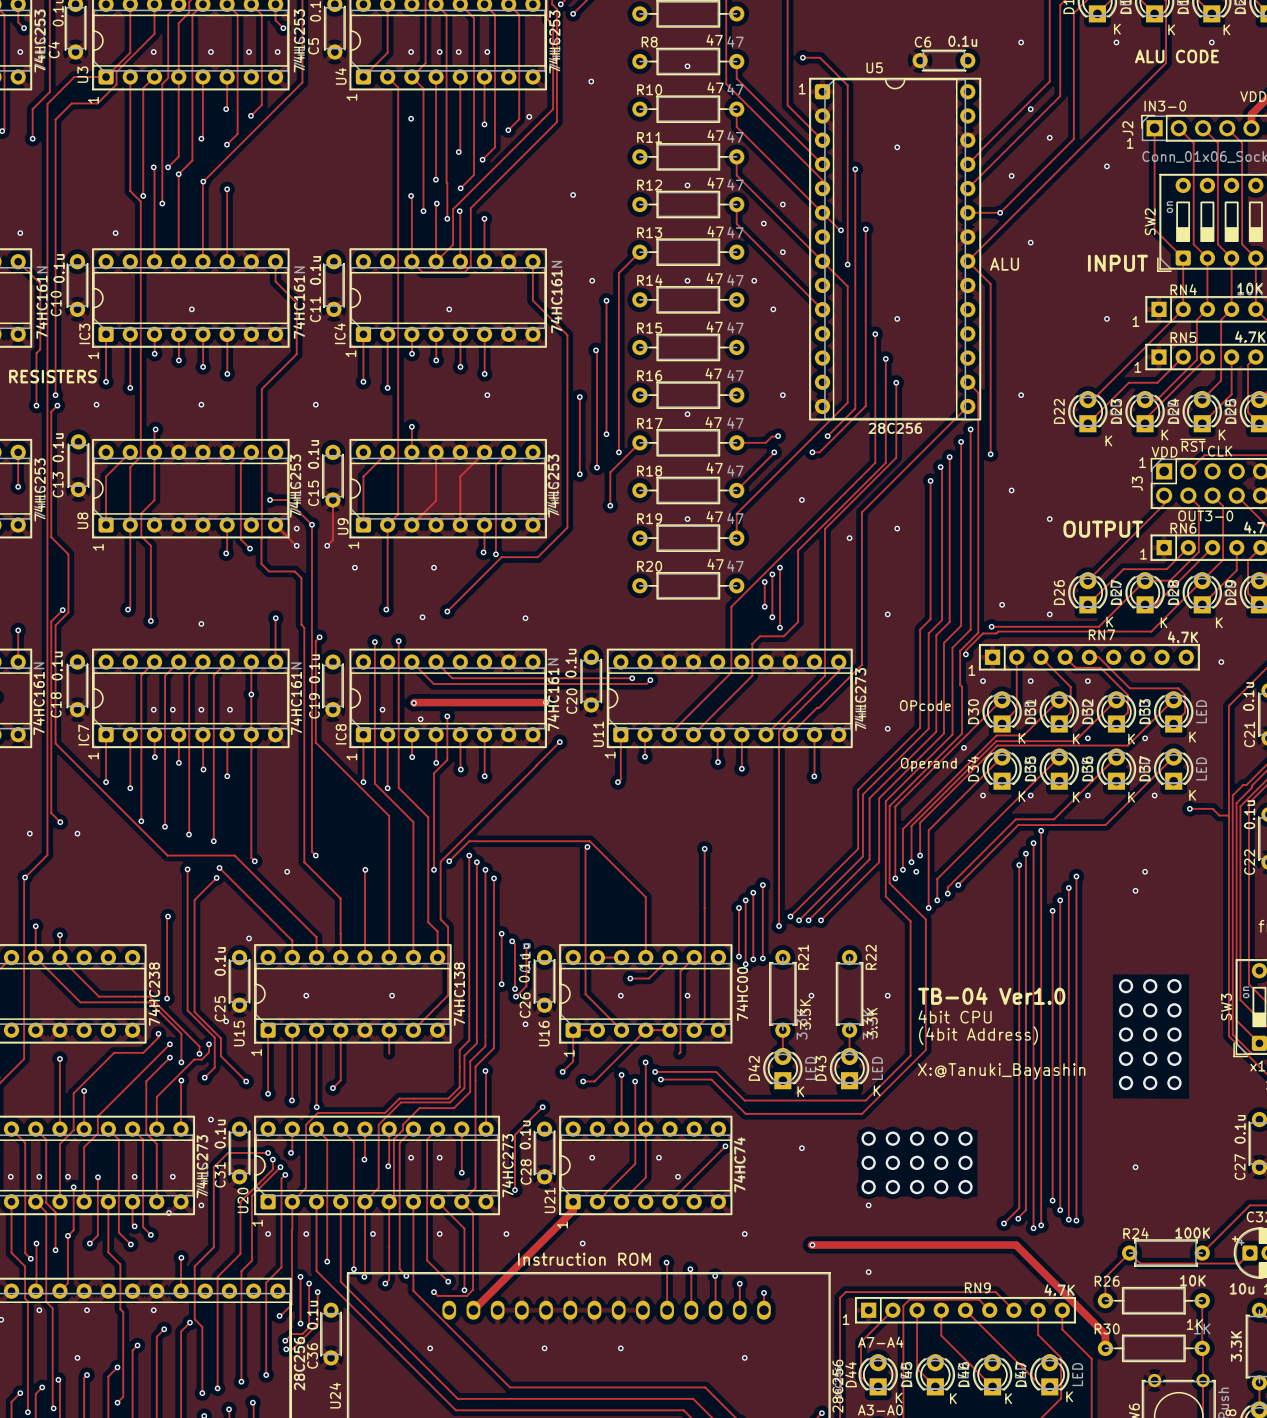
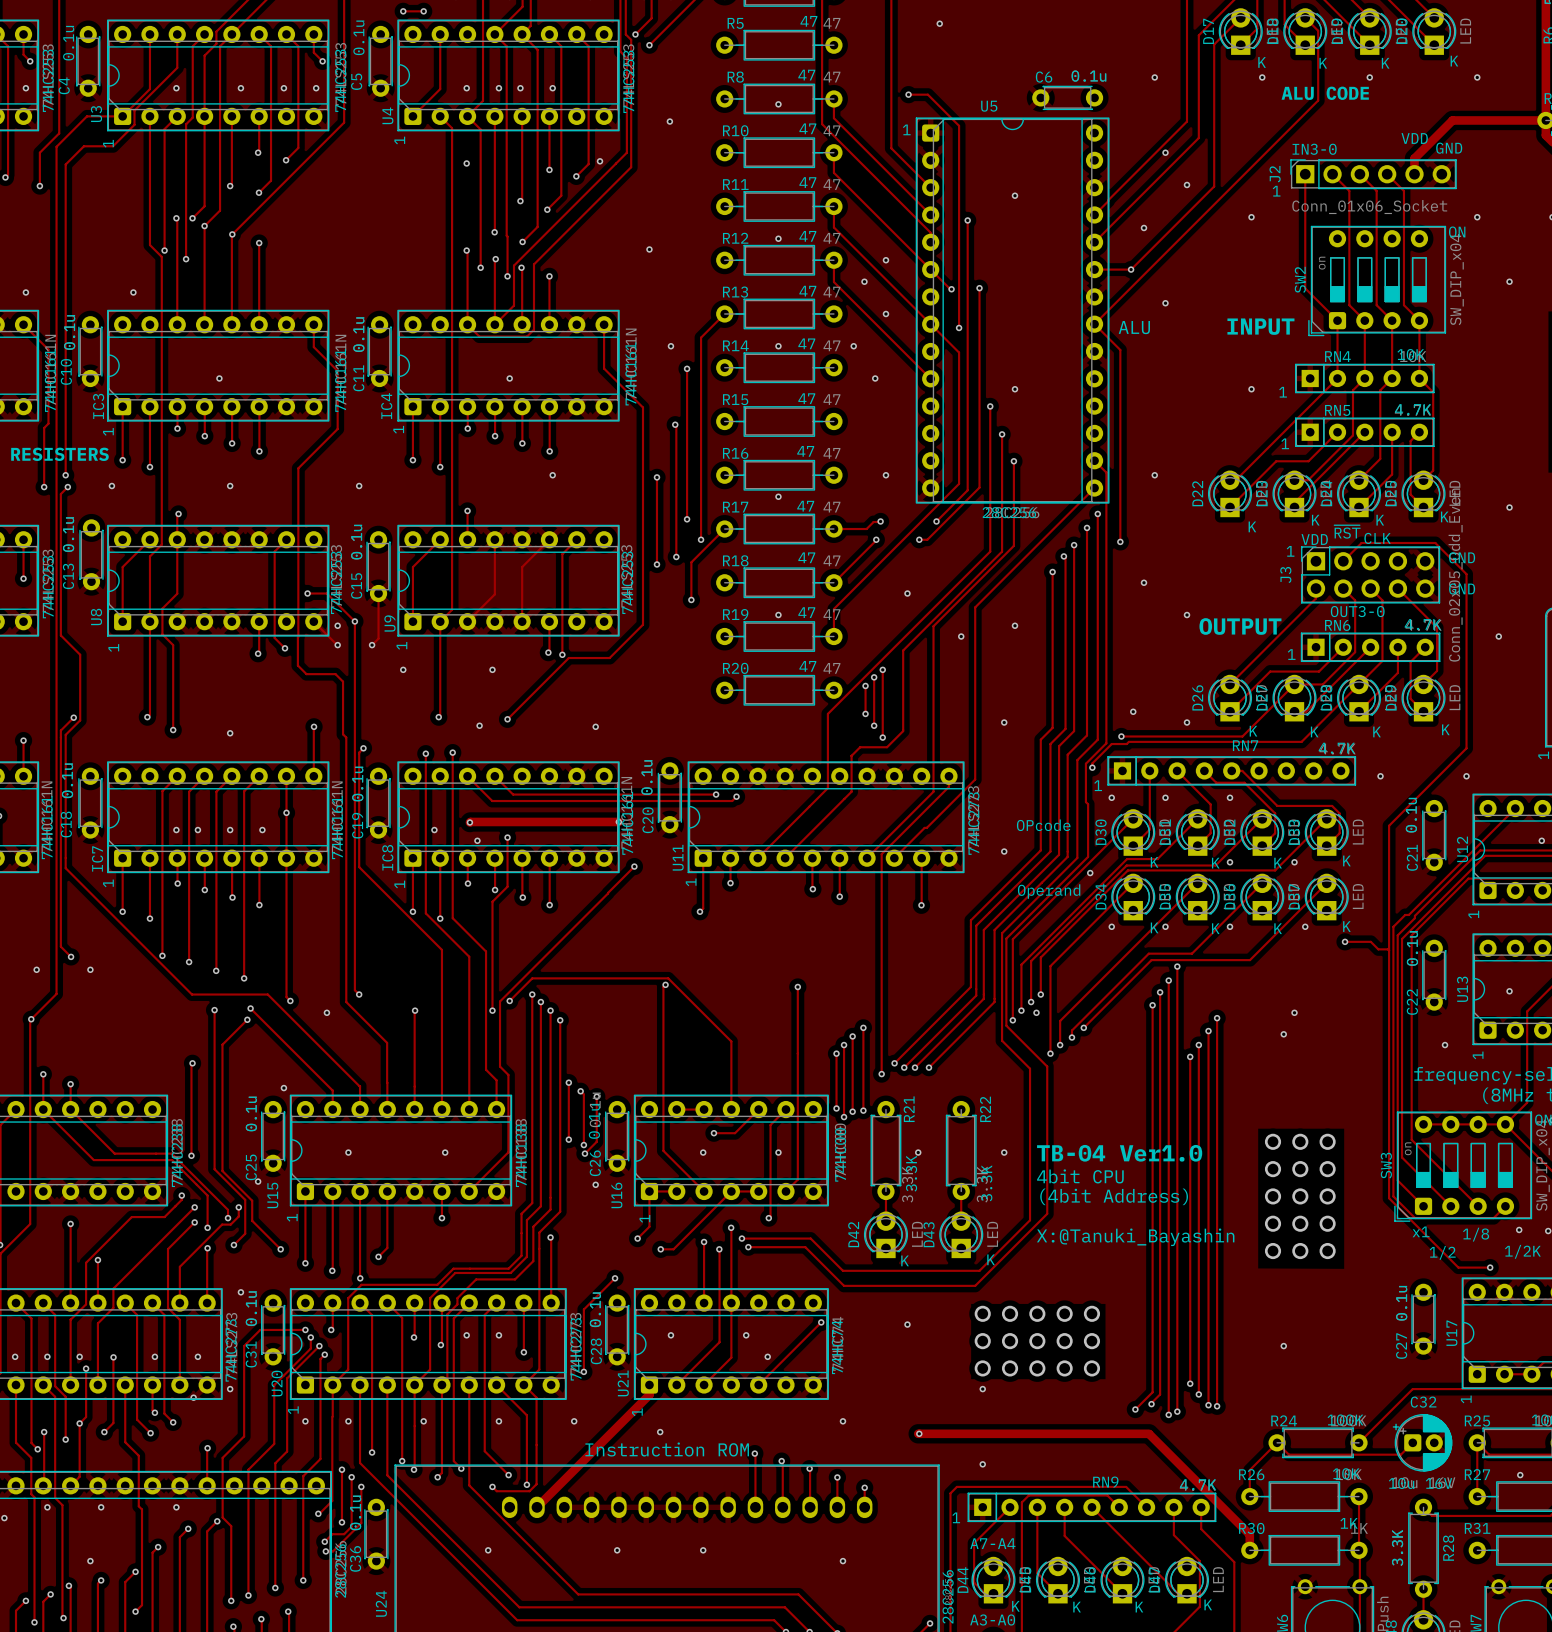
via: none -> (441, 1218)
via: none -> (768, 1218)

